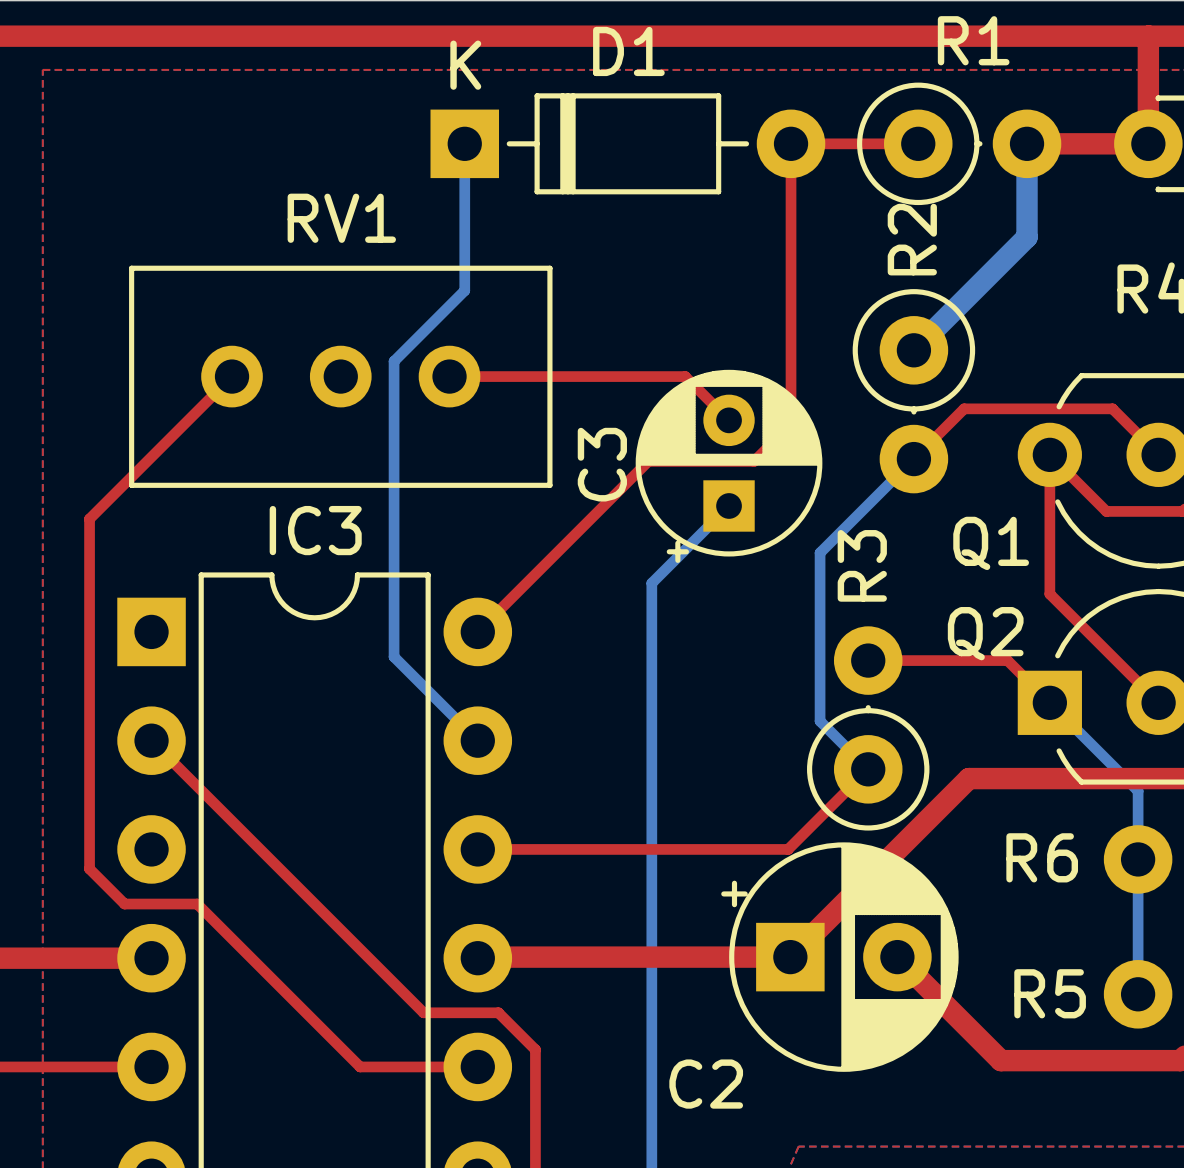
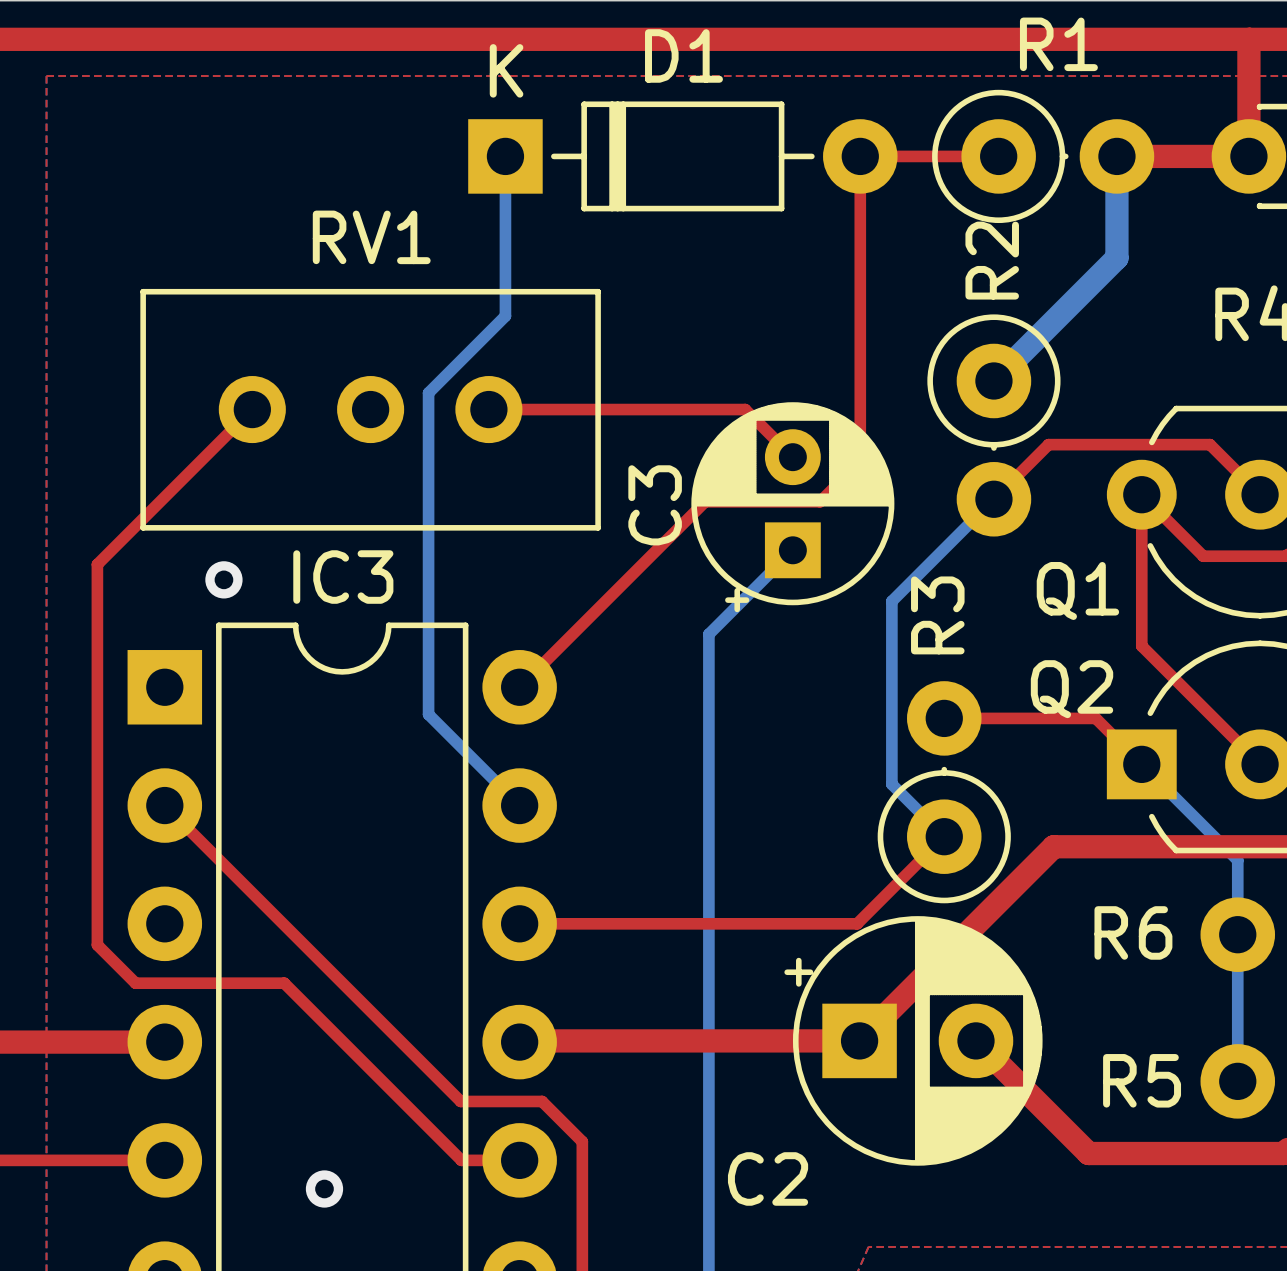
via: none -> (223, 579)
top track: (197, 904) (360, 1066) (424, 1066) -> (214, 983) (284, 983) (461, 1160)
via: none -> (324, 1189)

